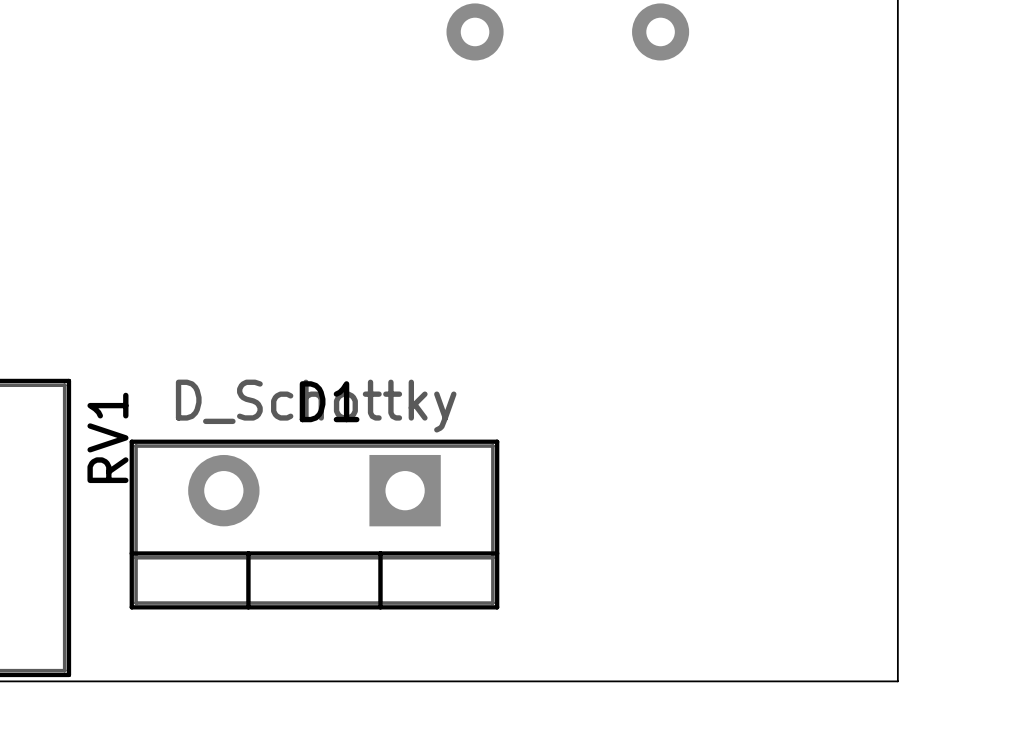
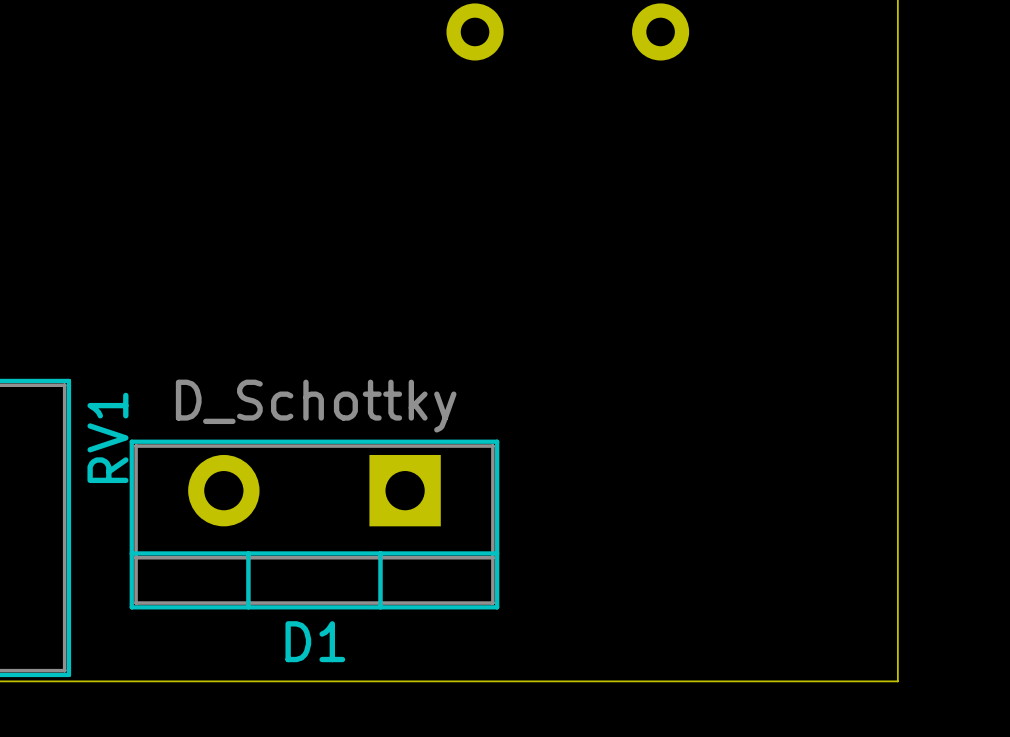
D1 name position: D1 (329, 401) -> D1 (315, 641)

